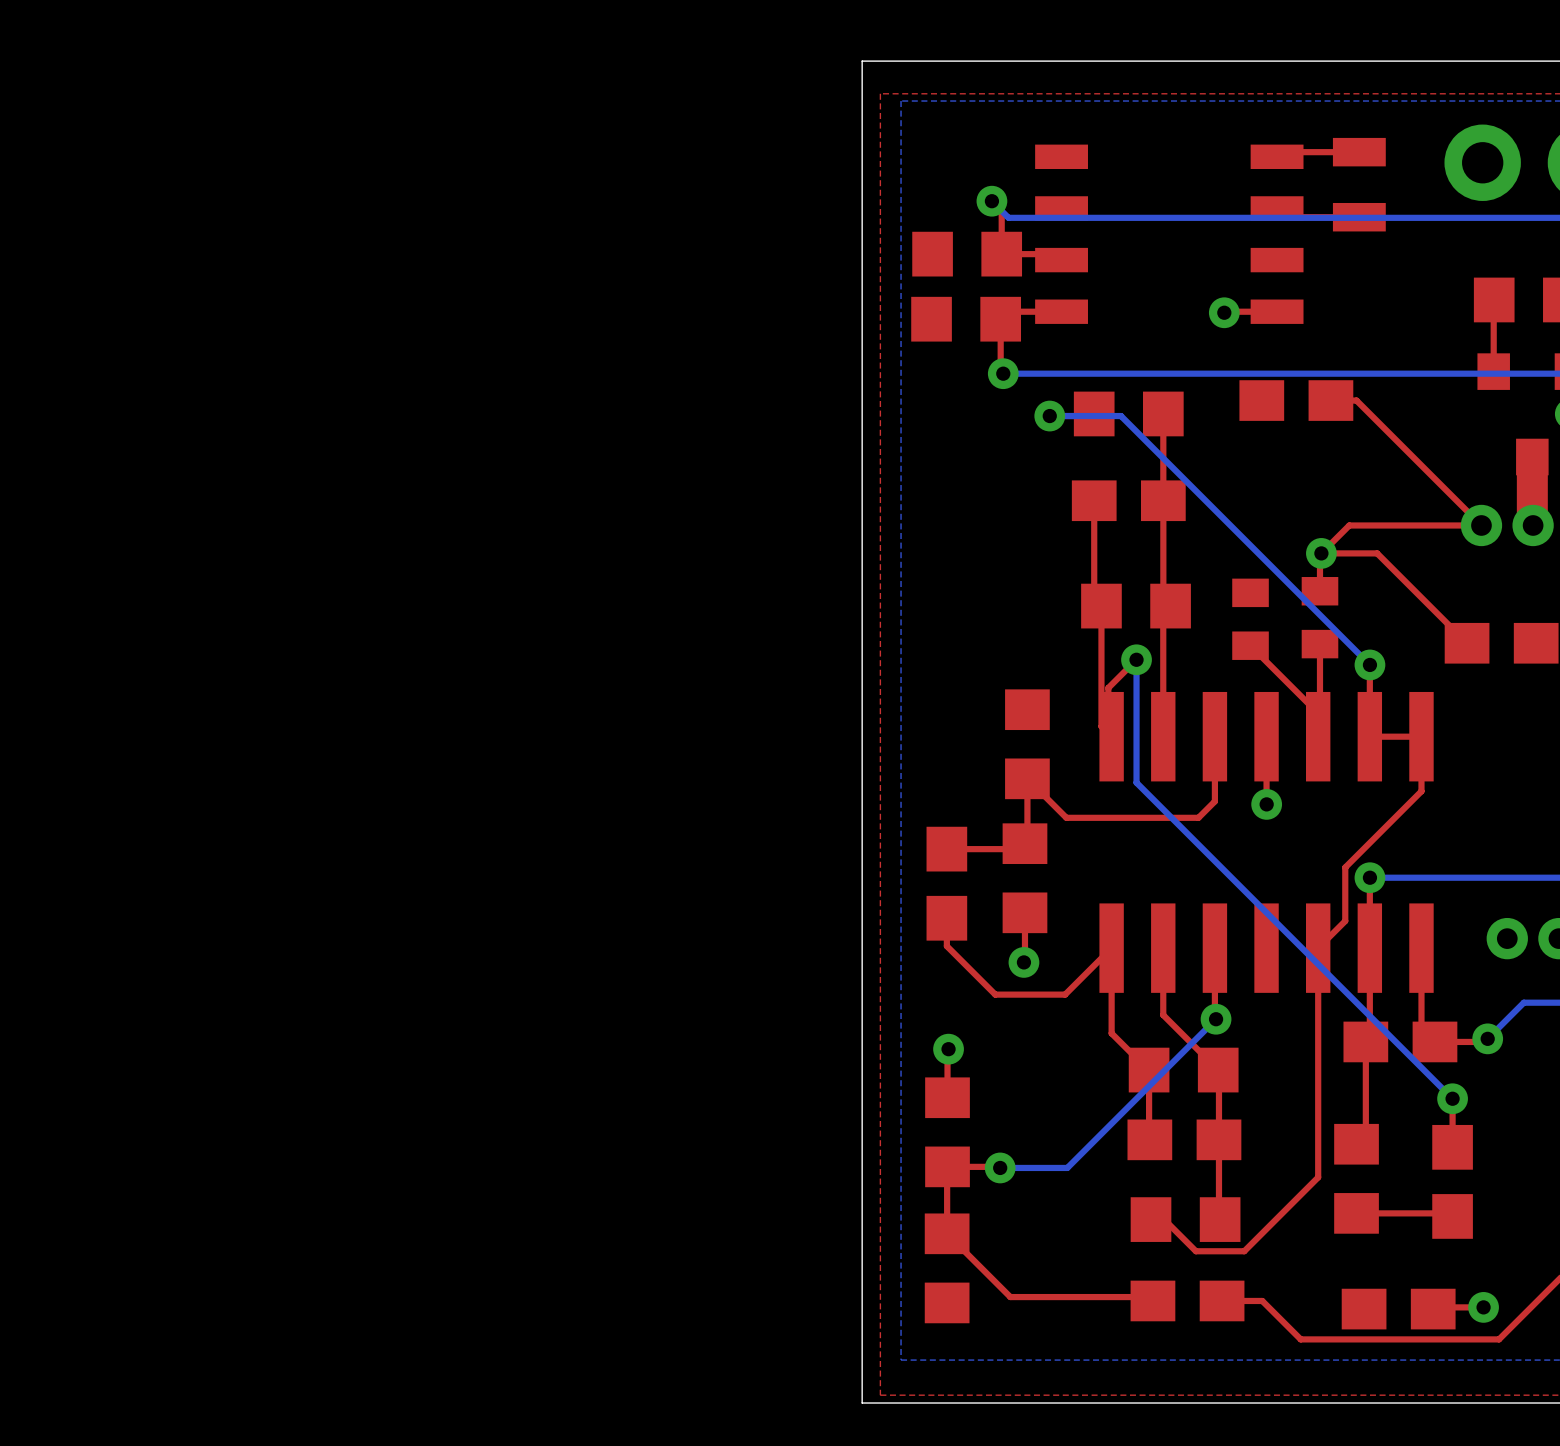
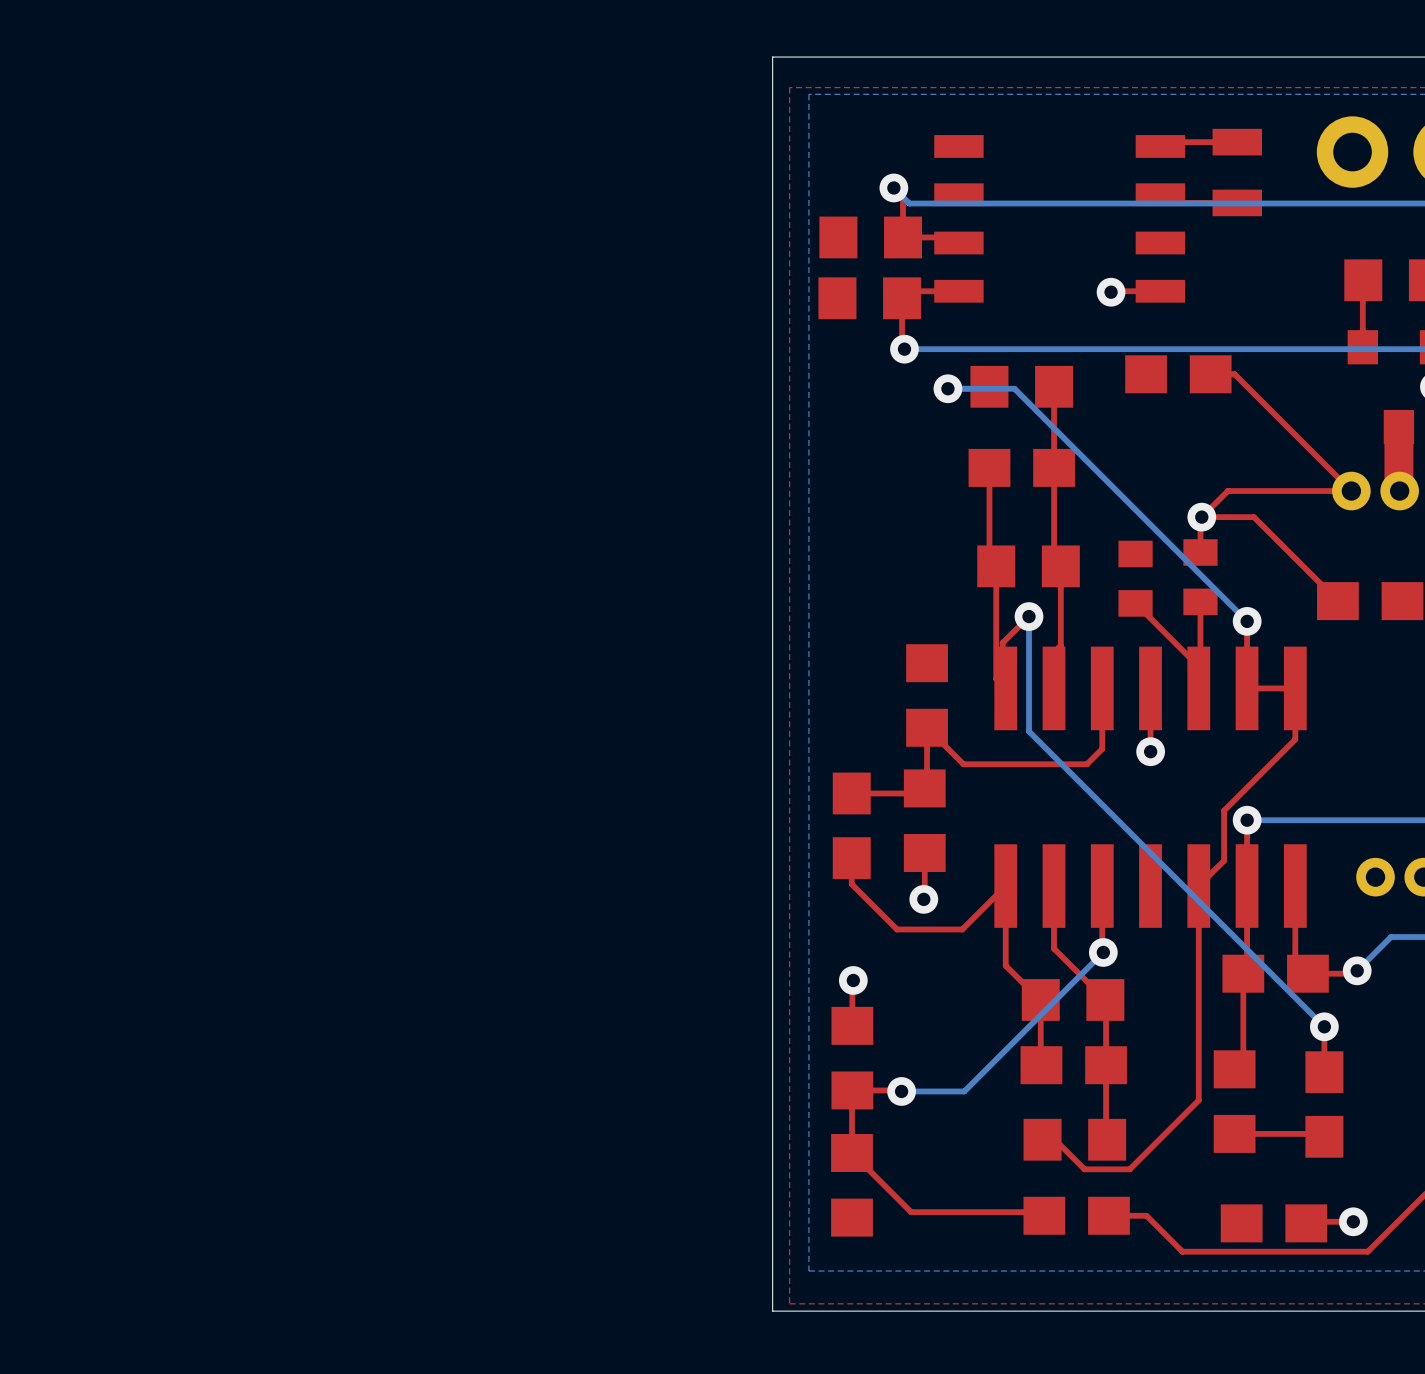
top track: (1170, 606) (1163, 613) (1163, 736) -> (1060, 566) (1060, 645) (1055, 651)

